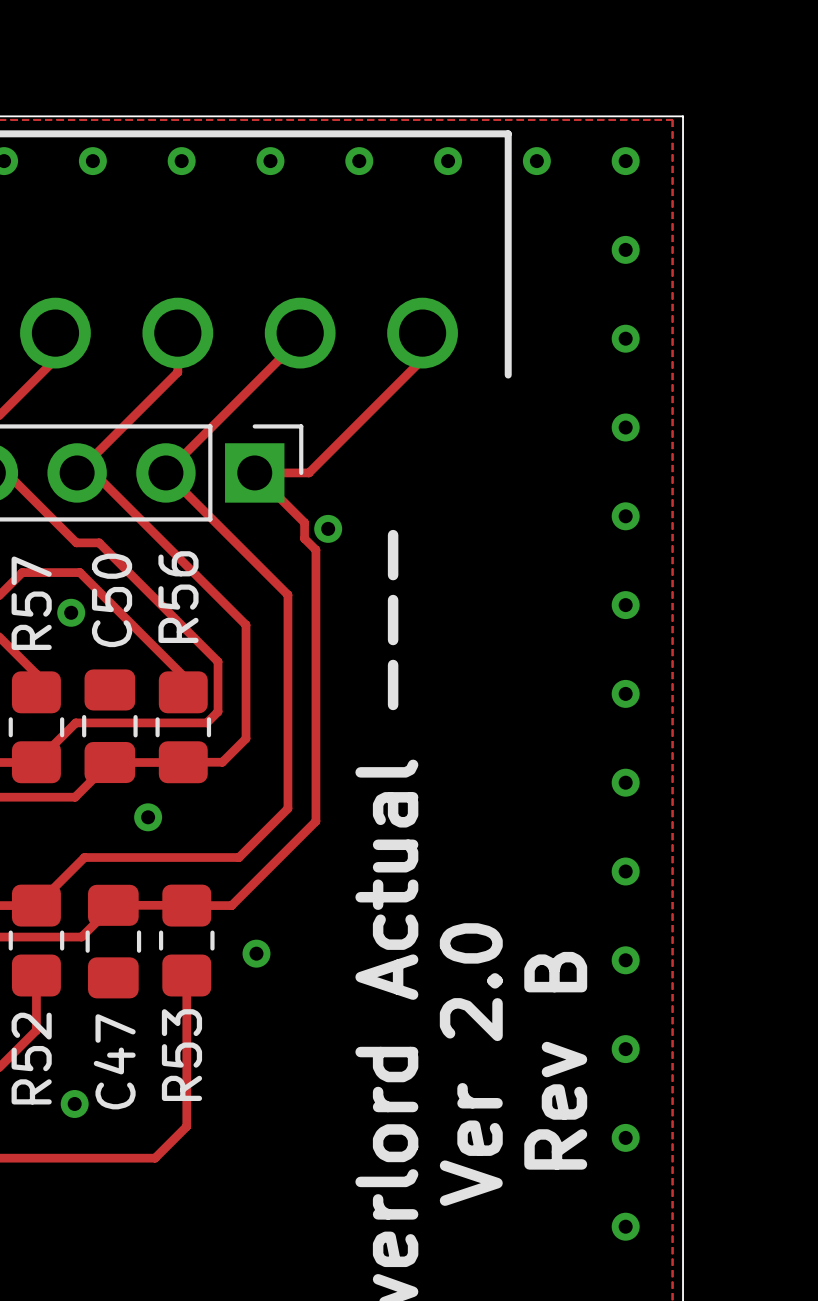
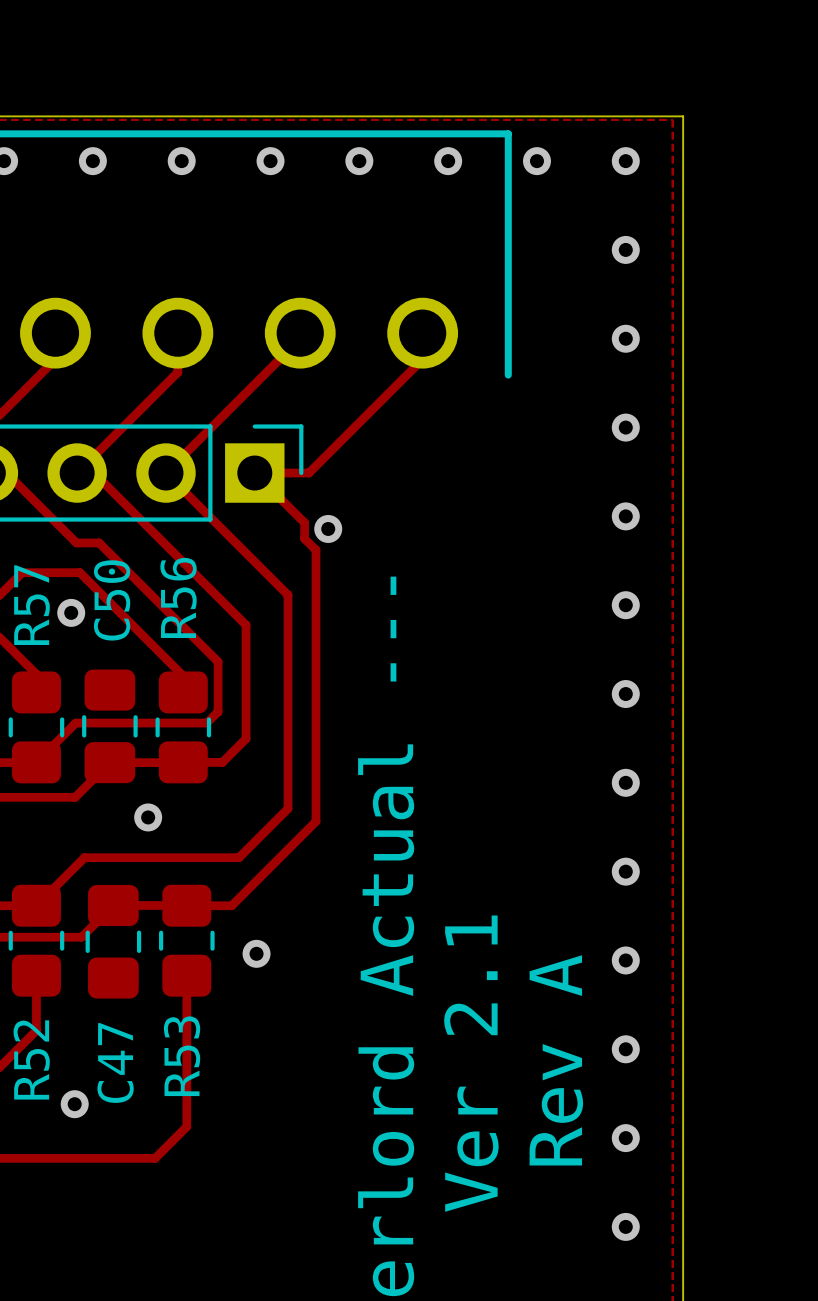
text: Rev B (555, 1060) -> Rev A (556, 1060)
text: Ver 2.0 (471, 1064) -> Ver 2.1 (471, 1063)

